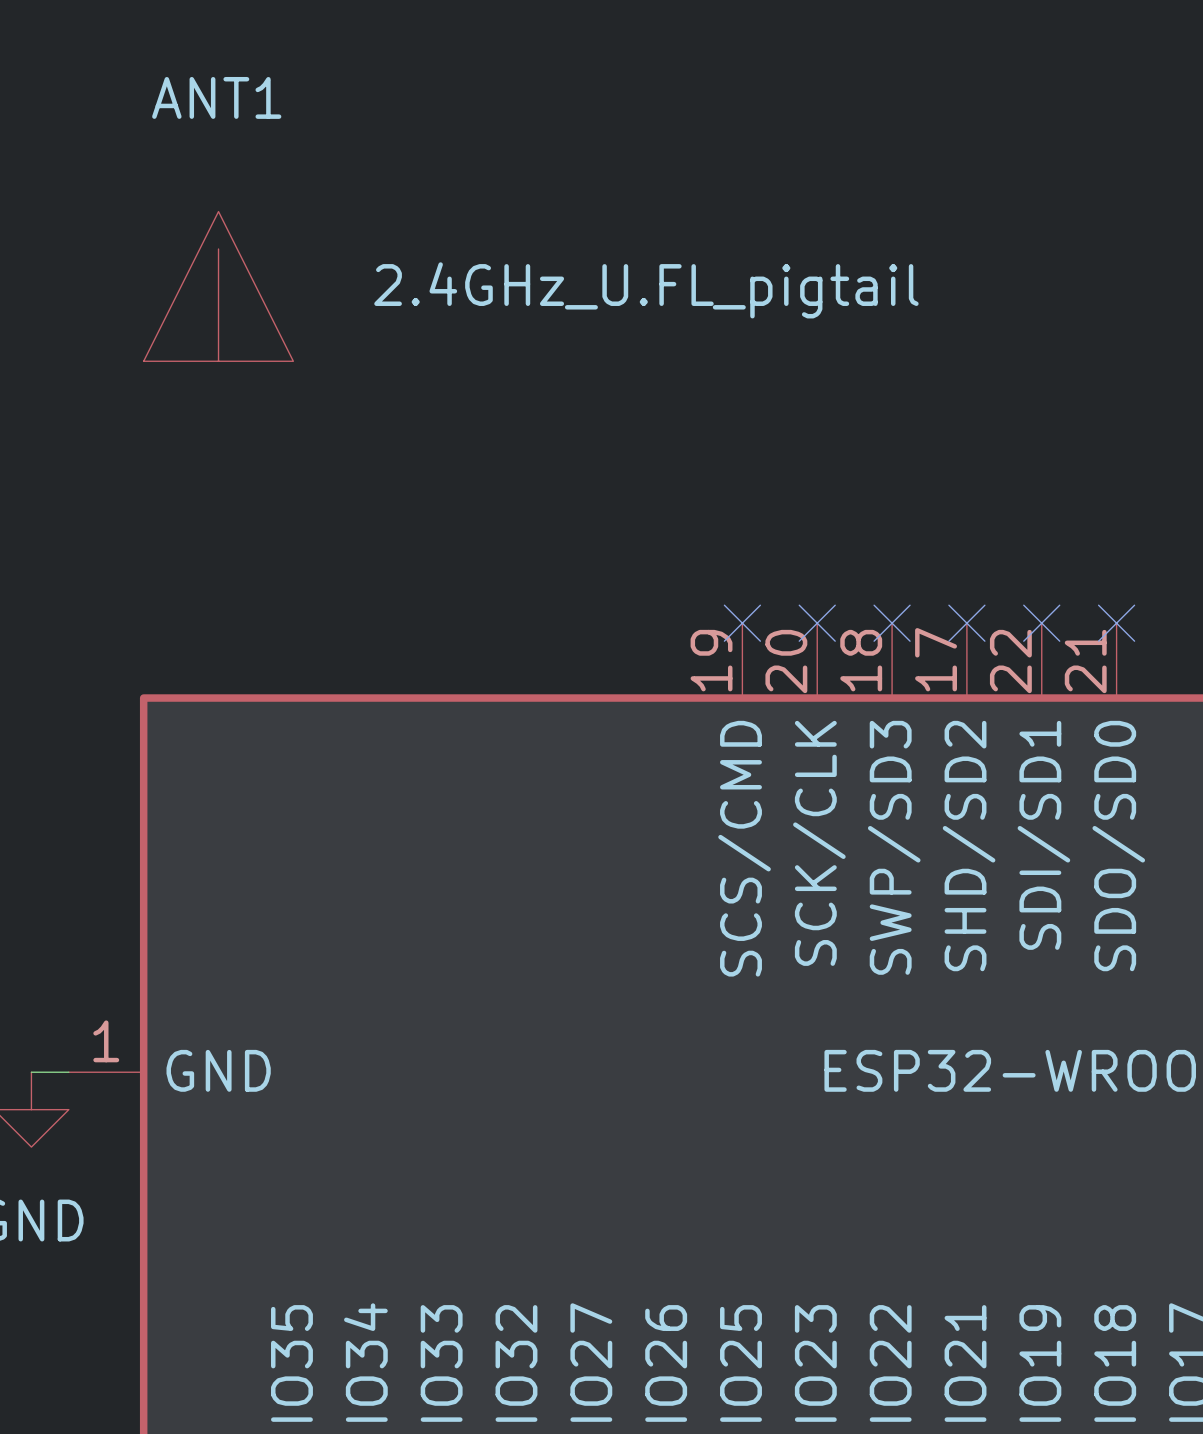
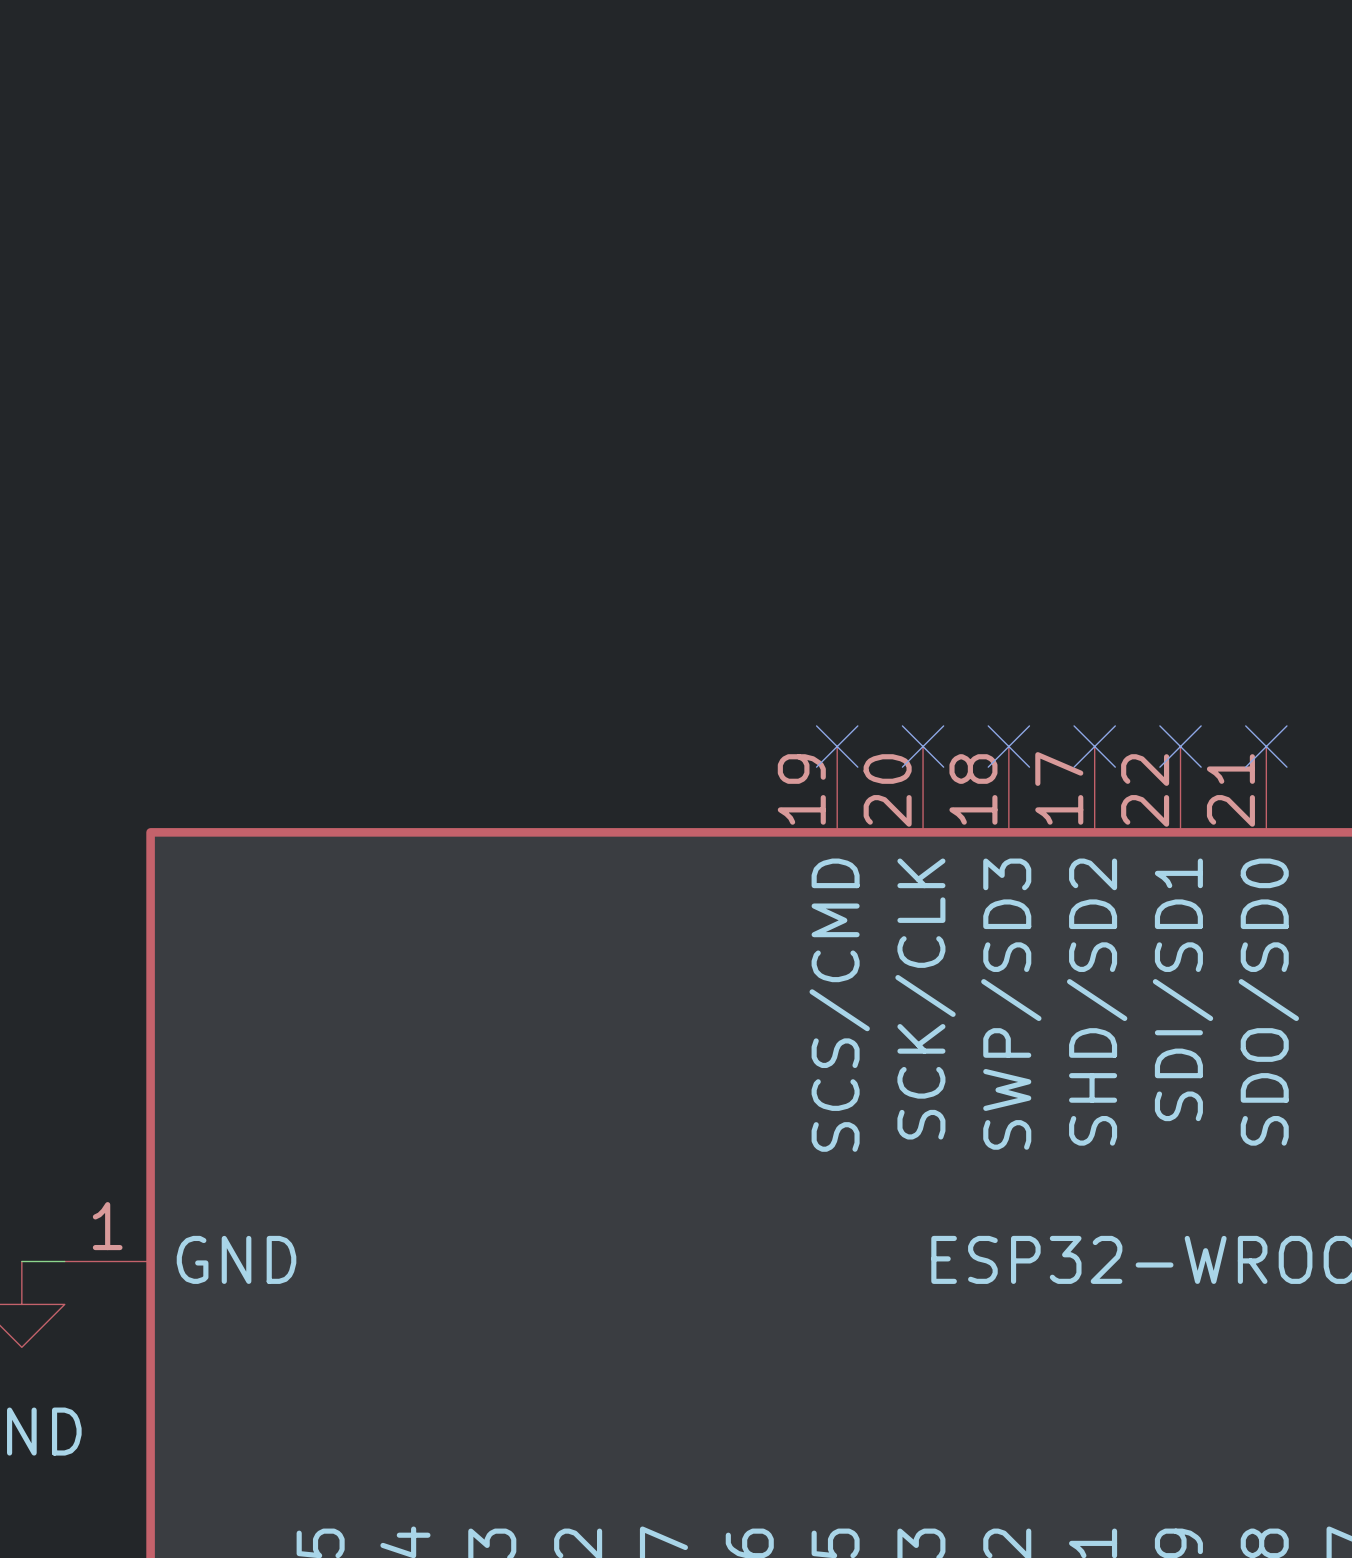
ANT1: 2.4GHz_U.FL_pigtail (218, 286) -> none

